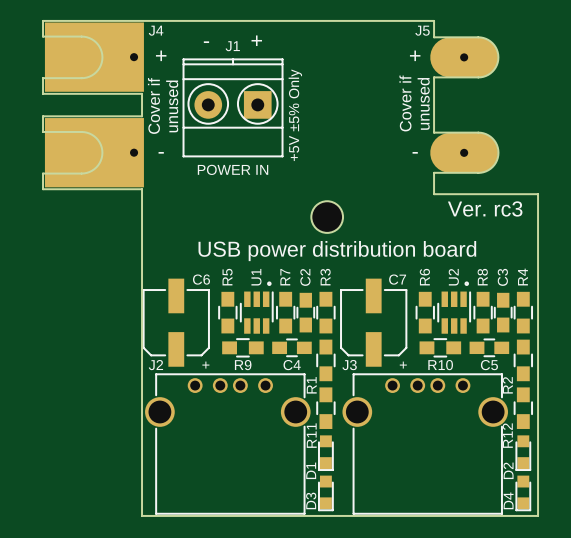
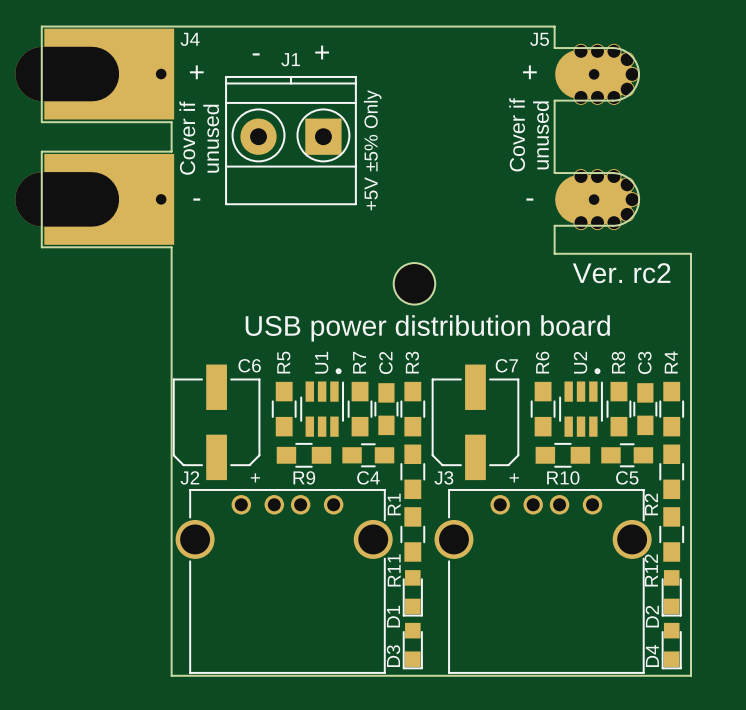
J4 footprint: [44, 22, 144, 188] -> [15, 28, 175, 245]
board edge: (43, 36) (89, 38) (98, 44) (102, 57) (98, 70) (89, 76) (43, 78) -> (41, 47) (41, 101)
J5 footprint: [430, 37, 499, 173] -> [555, 43, 640, 231]
board edge: (43, 131) (89, 133) (99, 142) (102, 152) (98, 165) (89, 171) (43, 173) -> (41, 172) (41, 226)
J1 value: POWER IN (233, 169) -> none
text: Ver. rc3 (485, 208) -> Ver. rc2 (621, 273)

